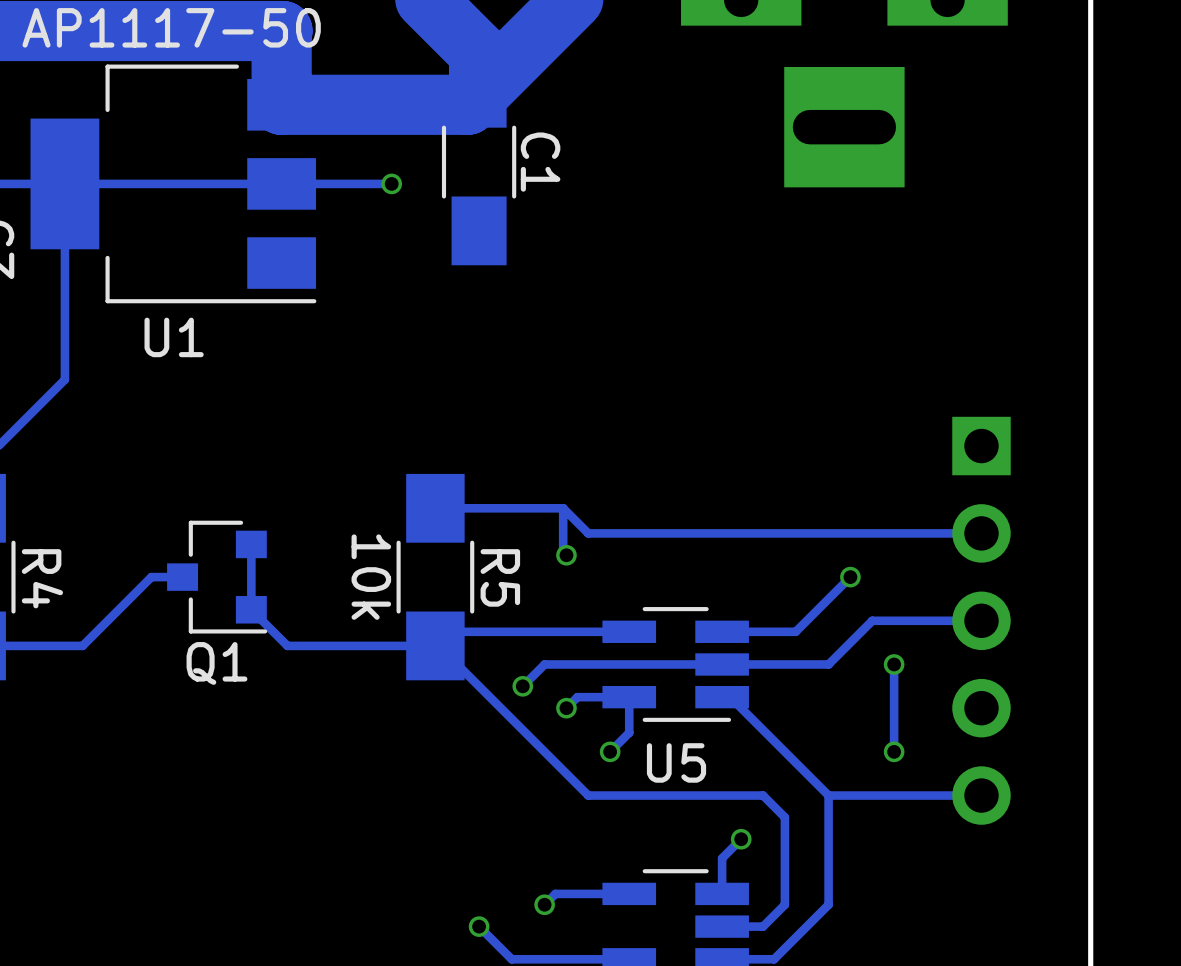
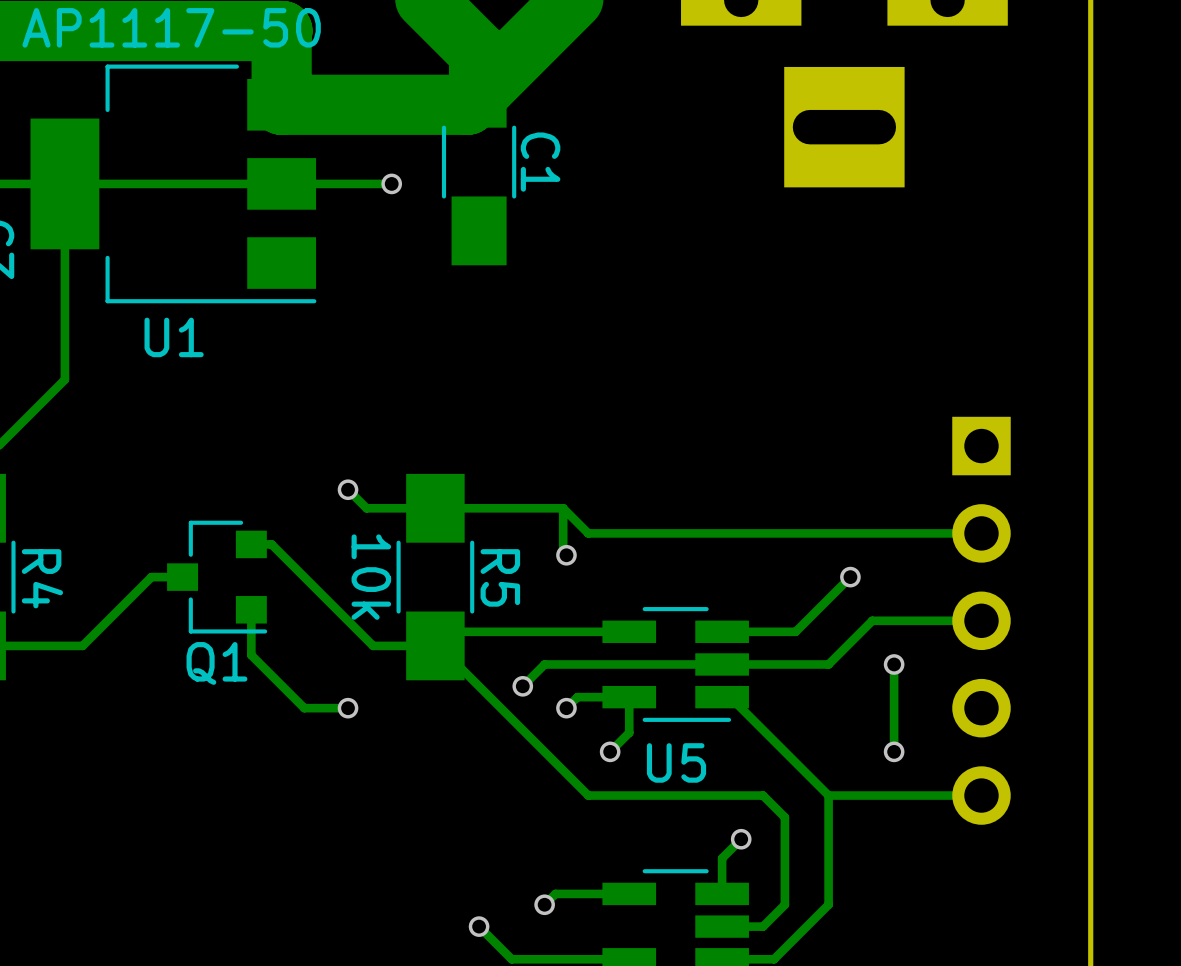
track: none -> (348, 489) (366, 508) (435, 508)
via: none -> (348, 489)
track: (251, 544) (251, 609) (287, 645) (373, 645) -> (251, 544) (271, 544) (373, 645)
track: none -> (251, 609) (251, 655) (304, 708) (348, 708)
via: none -> (348, 708)

